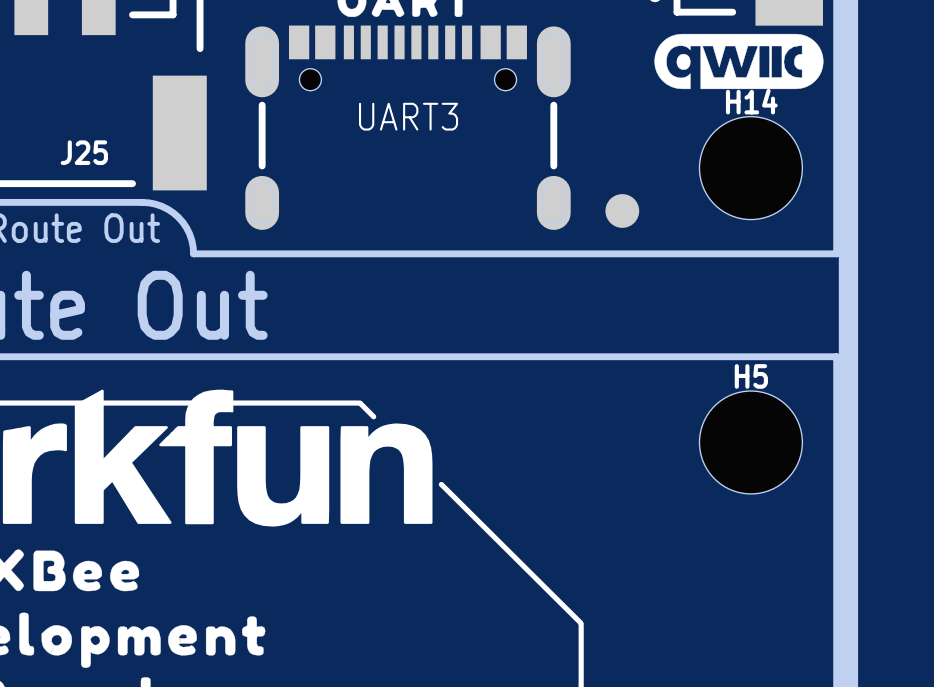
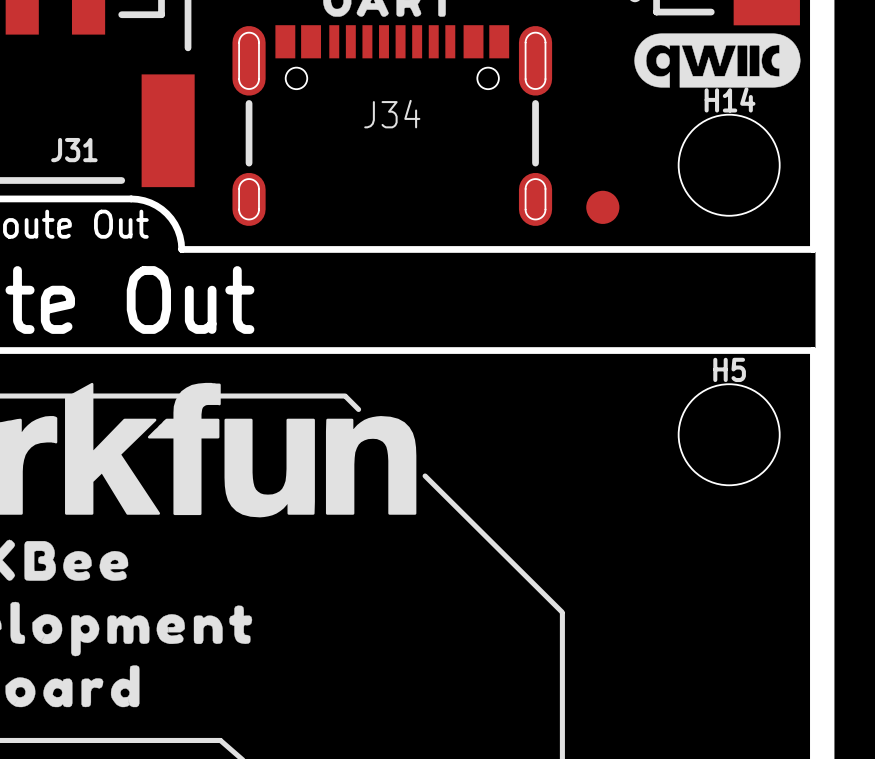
UART3 name: UART3 (408, 116) -> J34 (392, 114)
J25 name: J25 (84, 152) -> J31 (74, 150)

